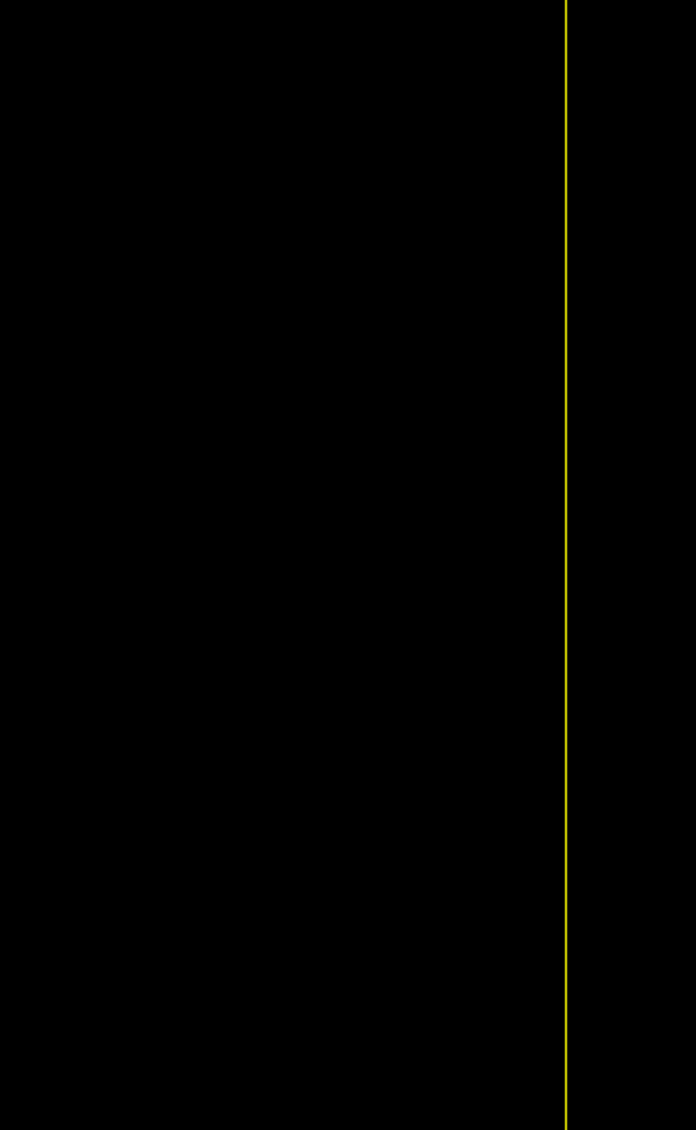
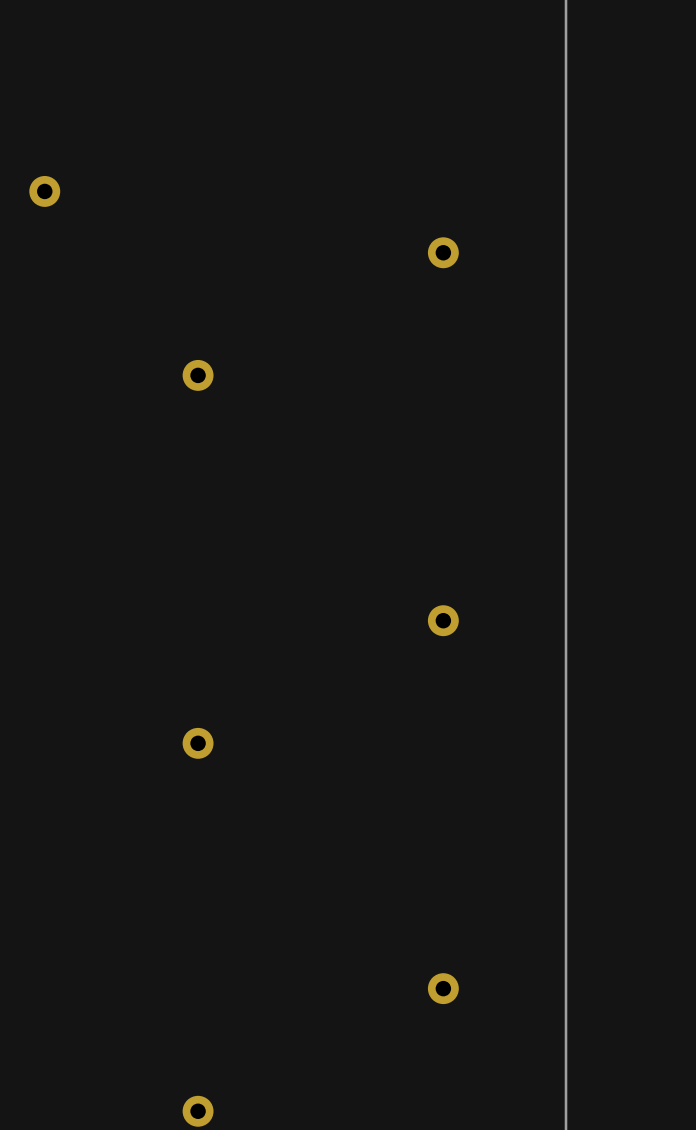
via: none -> (44, 191)
via: none -> (443, 252)
via: none -> (198, 375)
via: none -> (443, 620)
via: none -> (198, 743)
via: none -> (443, 988)
via: none -> (198, 1111)

